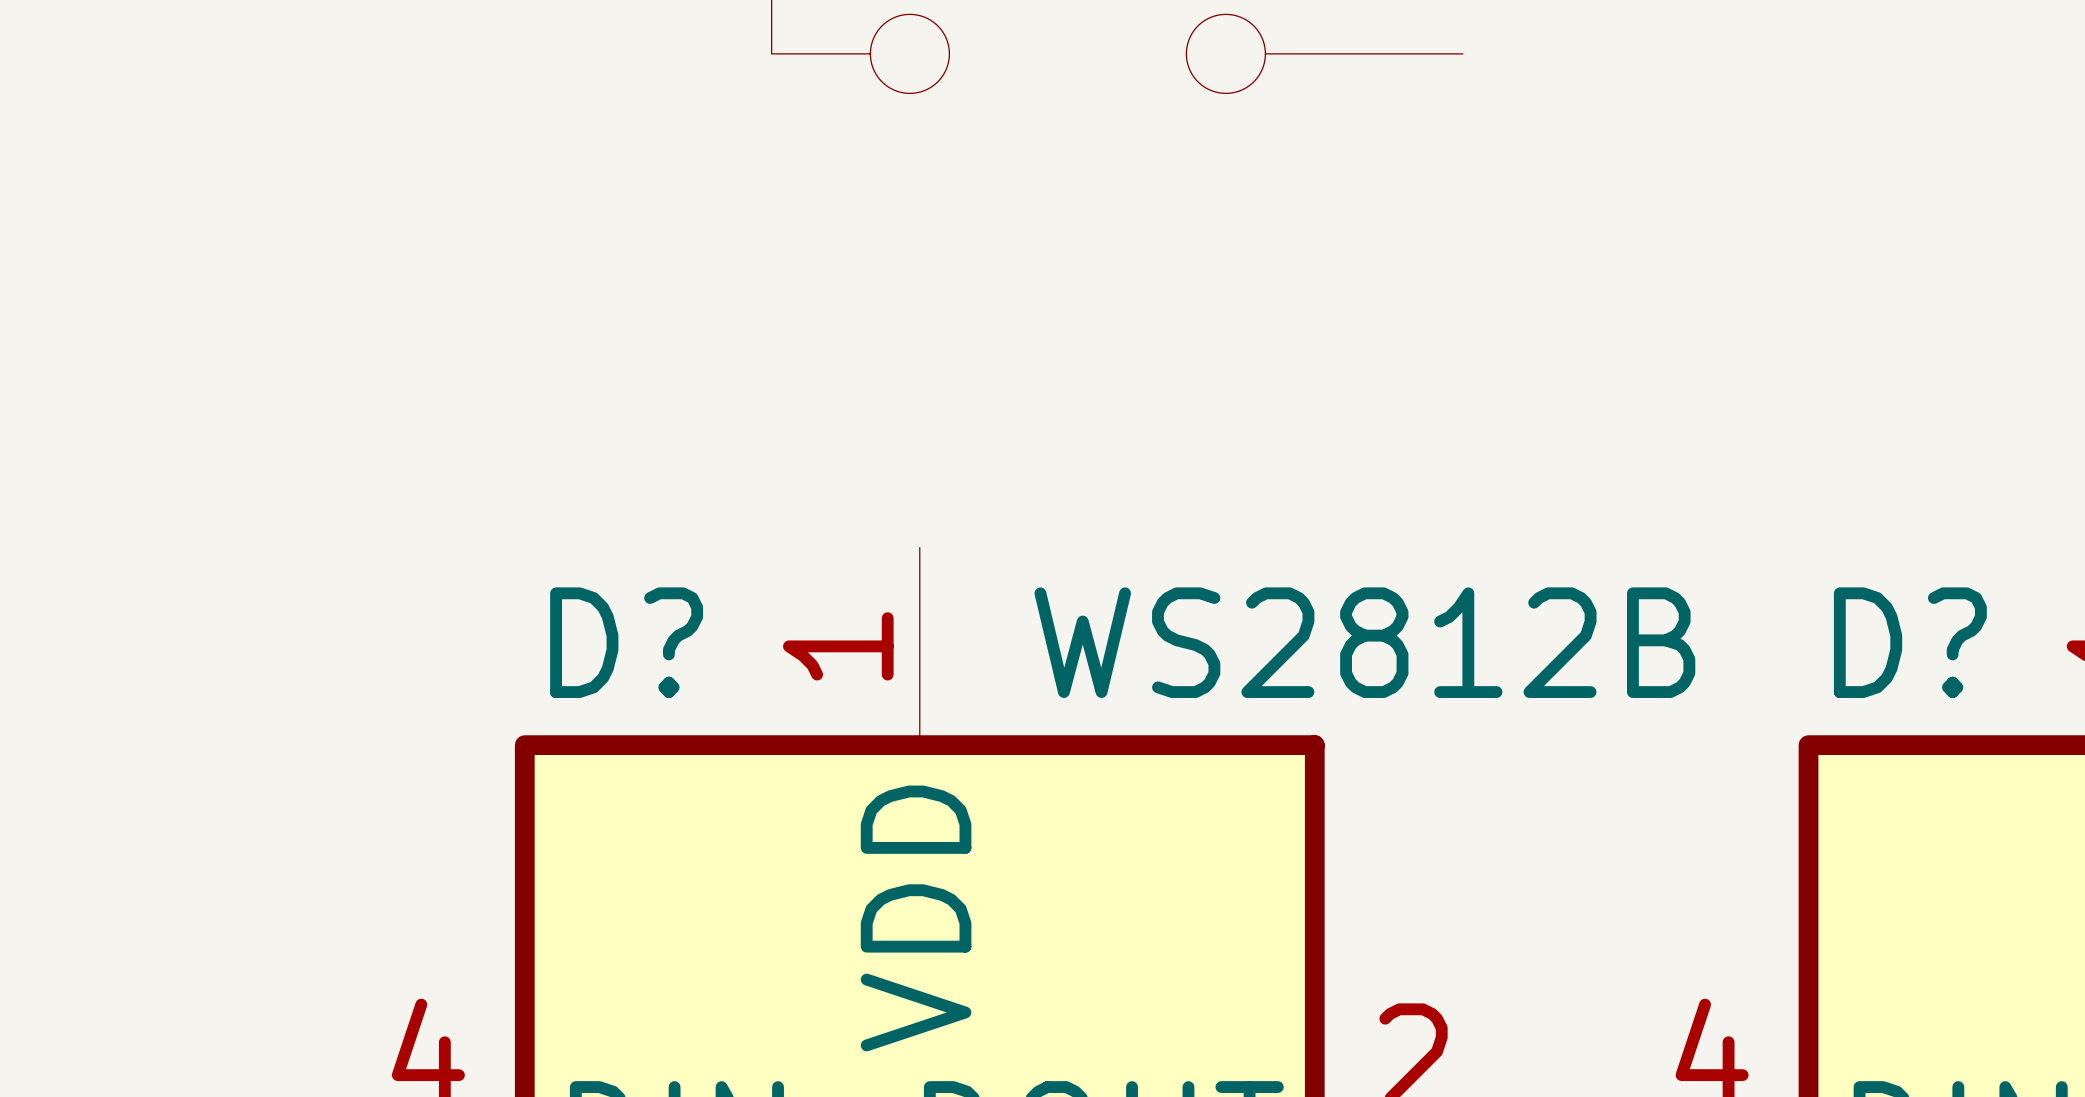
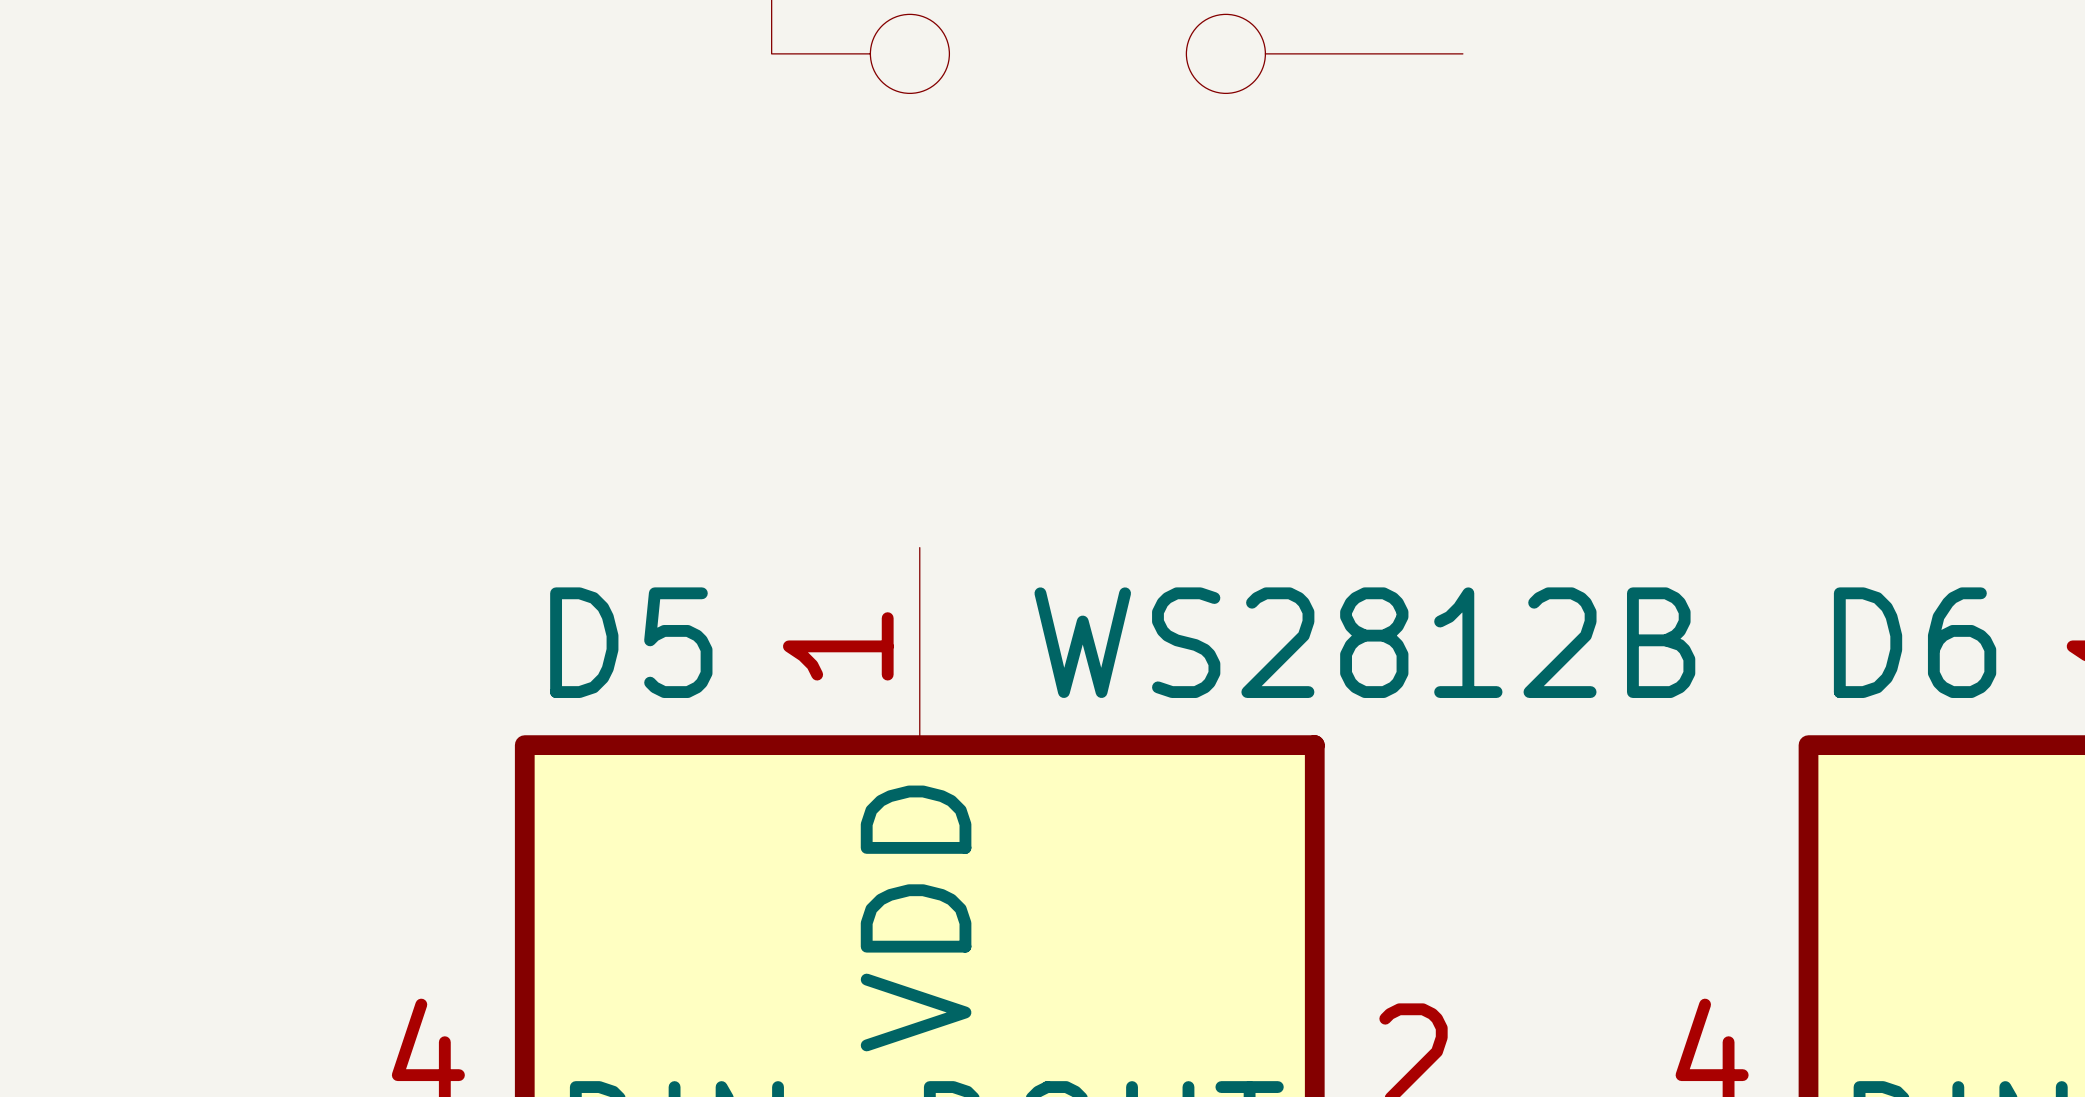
D? name: D? (626, 642) -> D5 (631, 642)
D? name: D? (1910, 642) -> D6 (1915, 642)

